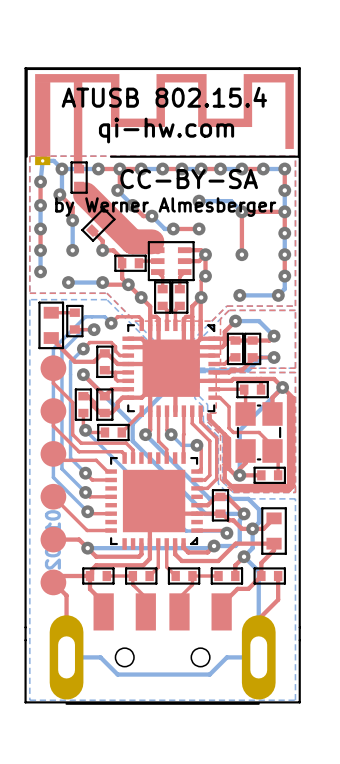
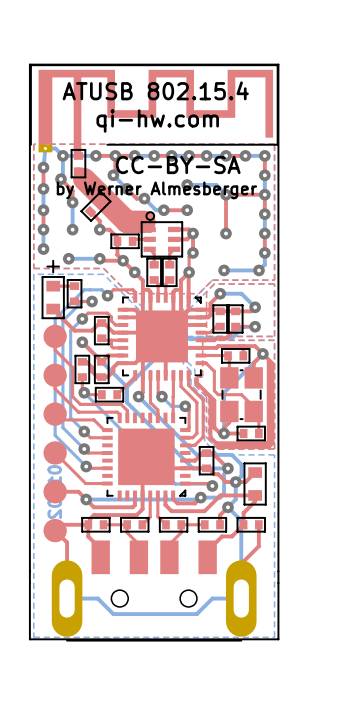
drawing: none -> [145, 211, 156, 221]
line: none -> (53, 260) (53, 272)
line: none -> (47, 266) (59, 266)

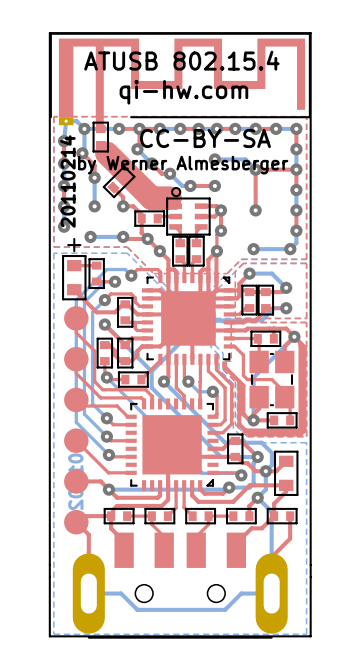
text: none -> 20110214 (67, 181)

